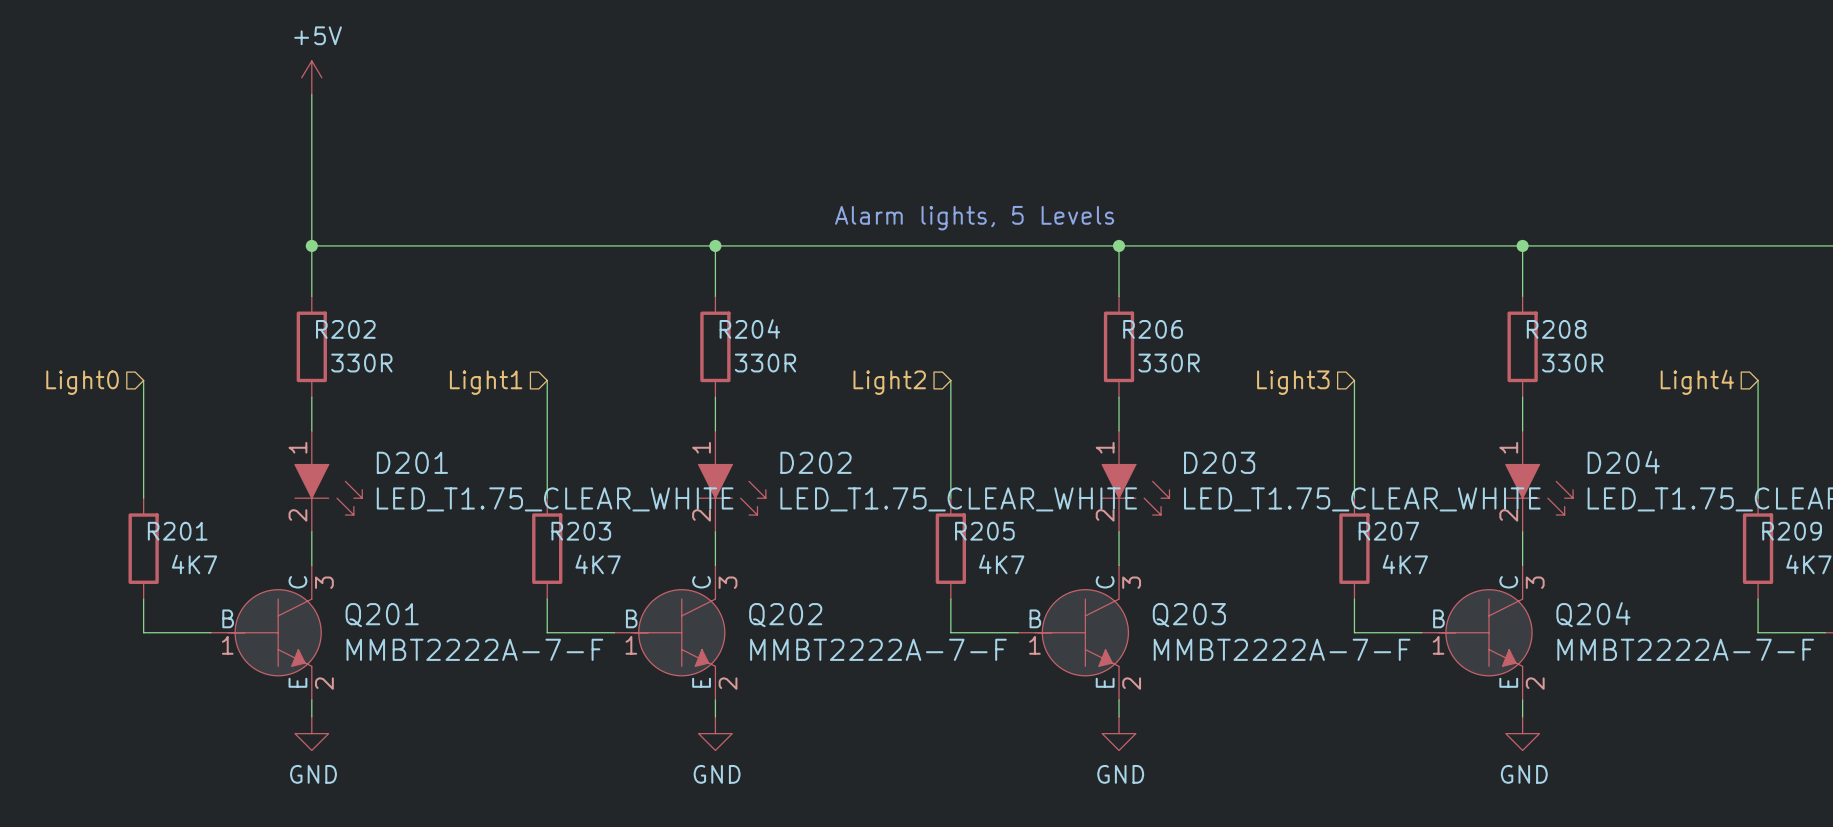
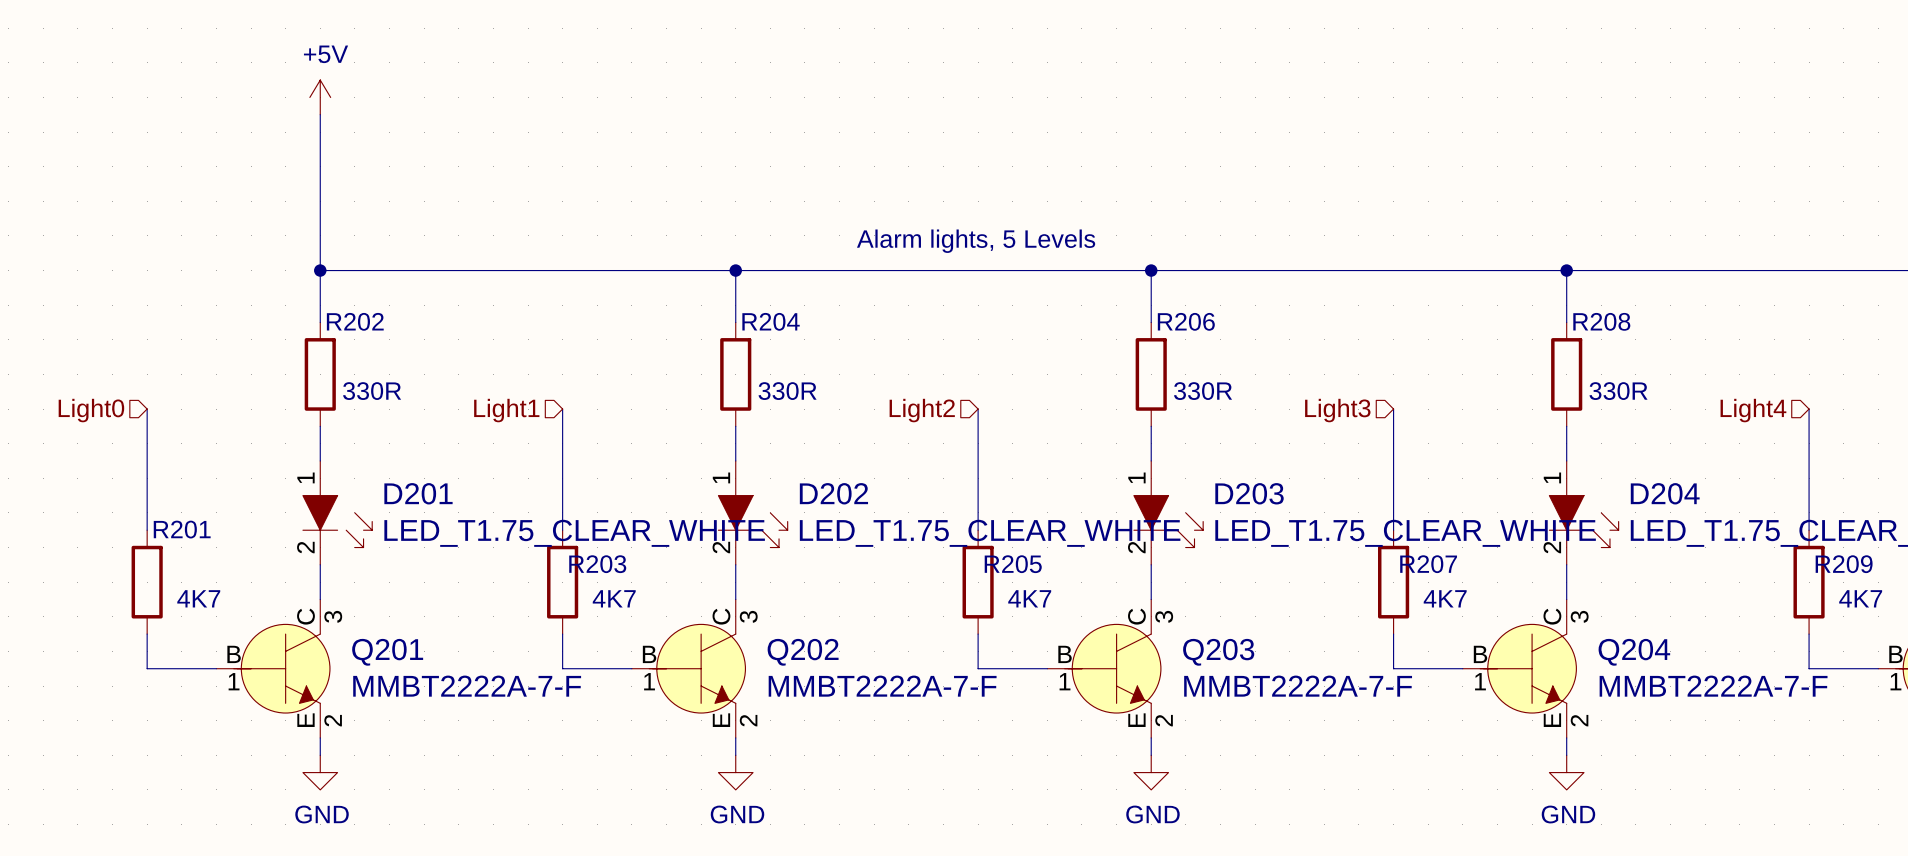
R202 name position: R202 (345, 329) -> R202 (355, 321)
R204 name position: R204 (749, 329) -> R204 (771, 321)
R206 name position: R206 (1153, 329) -> R206 (1186, 321)
R208 name position: R208 (1556, 329) -> R208 (1601, 321)
R201 name position: R201 (177, 531) -> R201 (182, 529)

